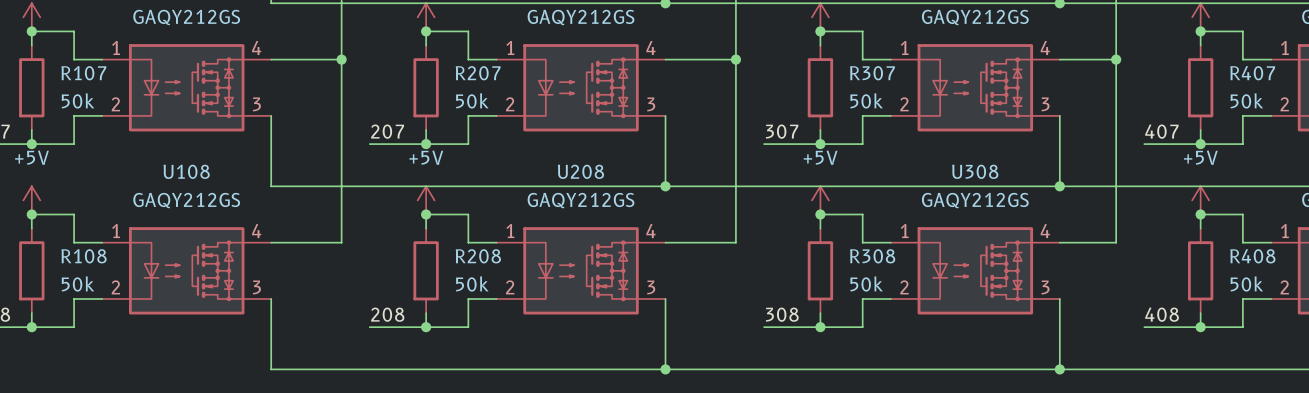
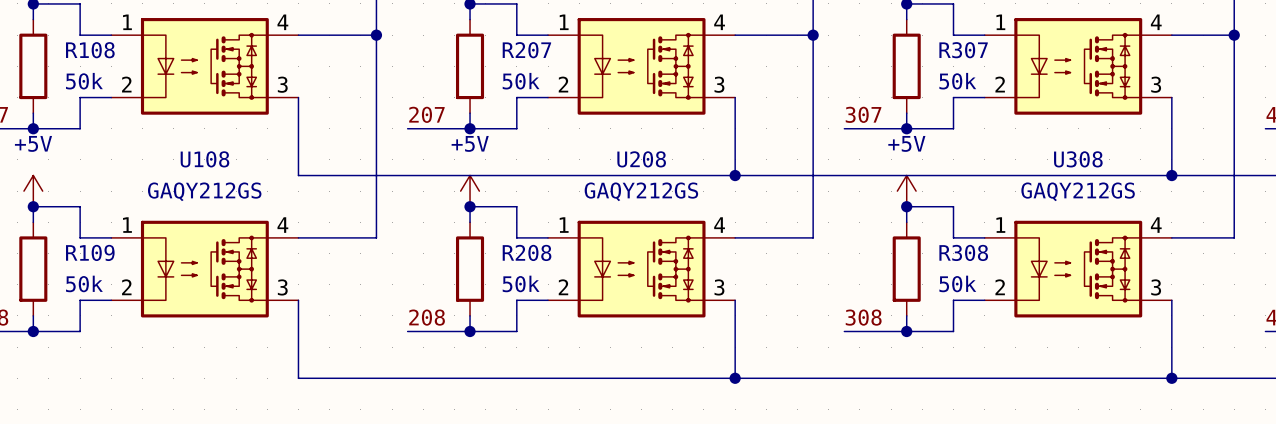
R107 name: R107 (83, 73) -> R108 (90, 50)
R108 name: R108 (83, 256) -> R109 (90, 252)

